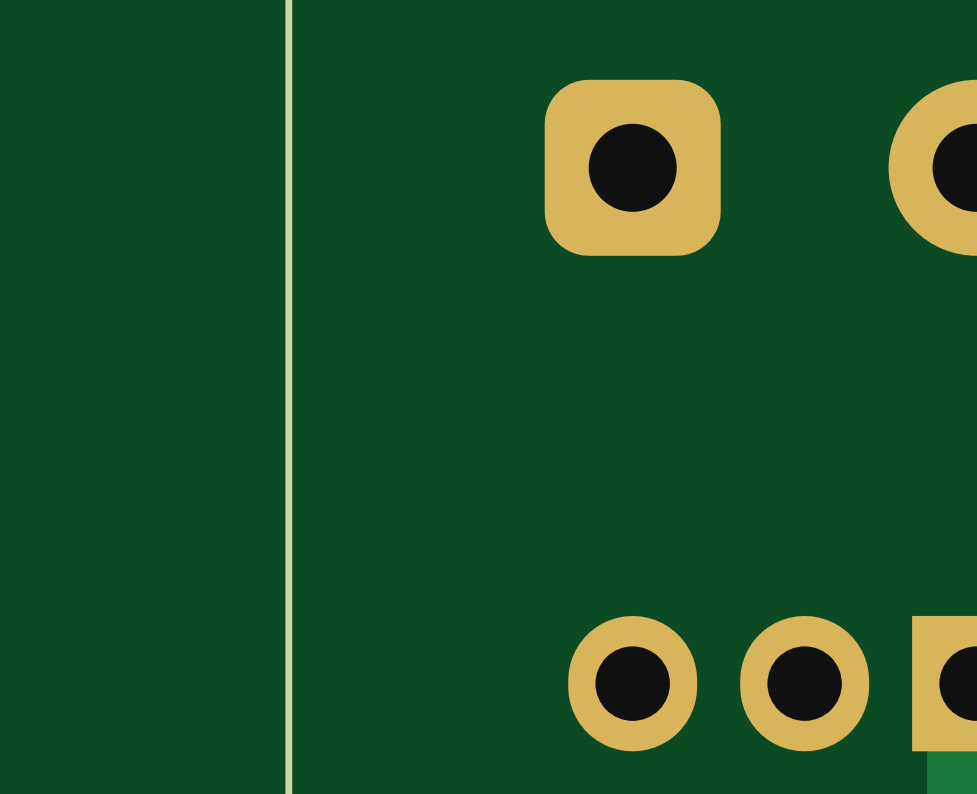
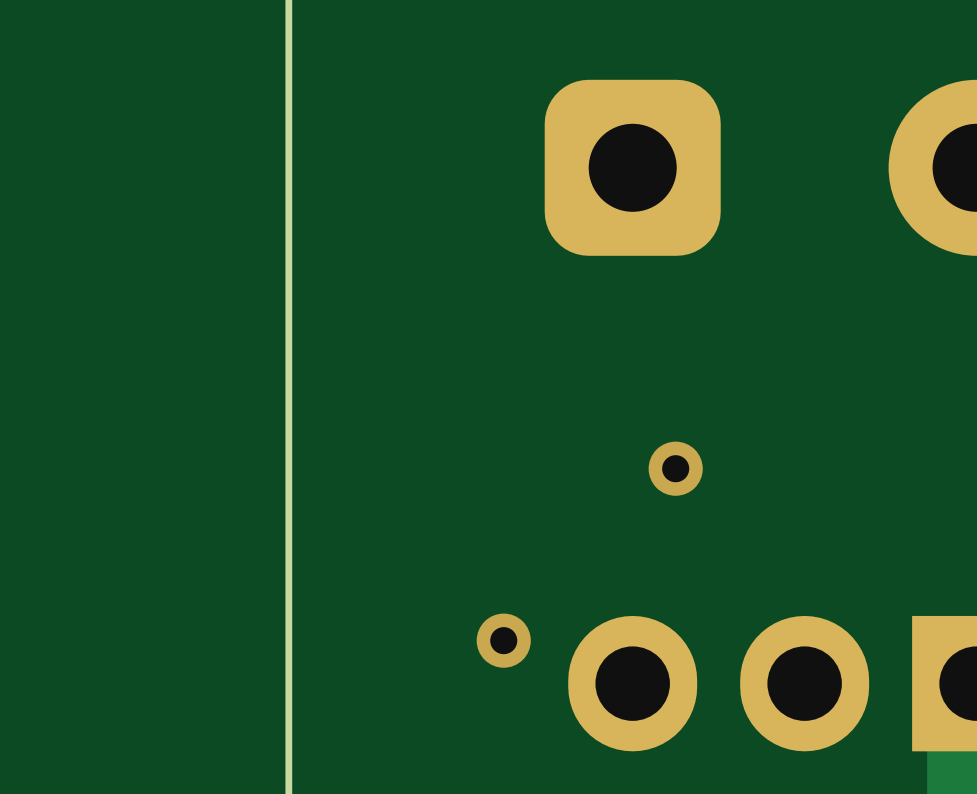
via: none -> (675, 468)
via: none -> (503, 640)

